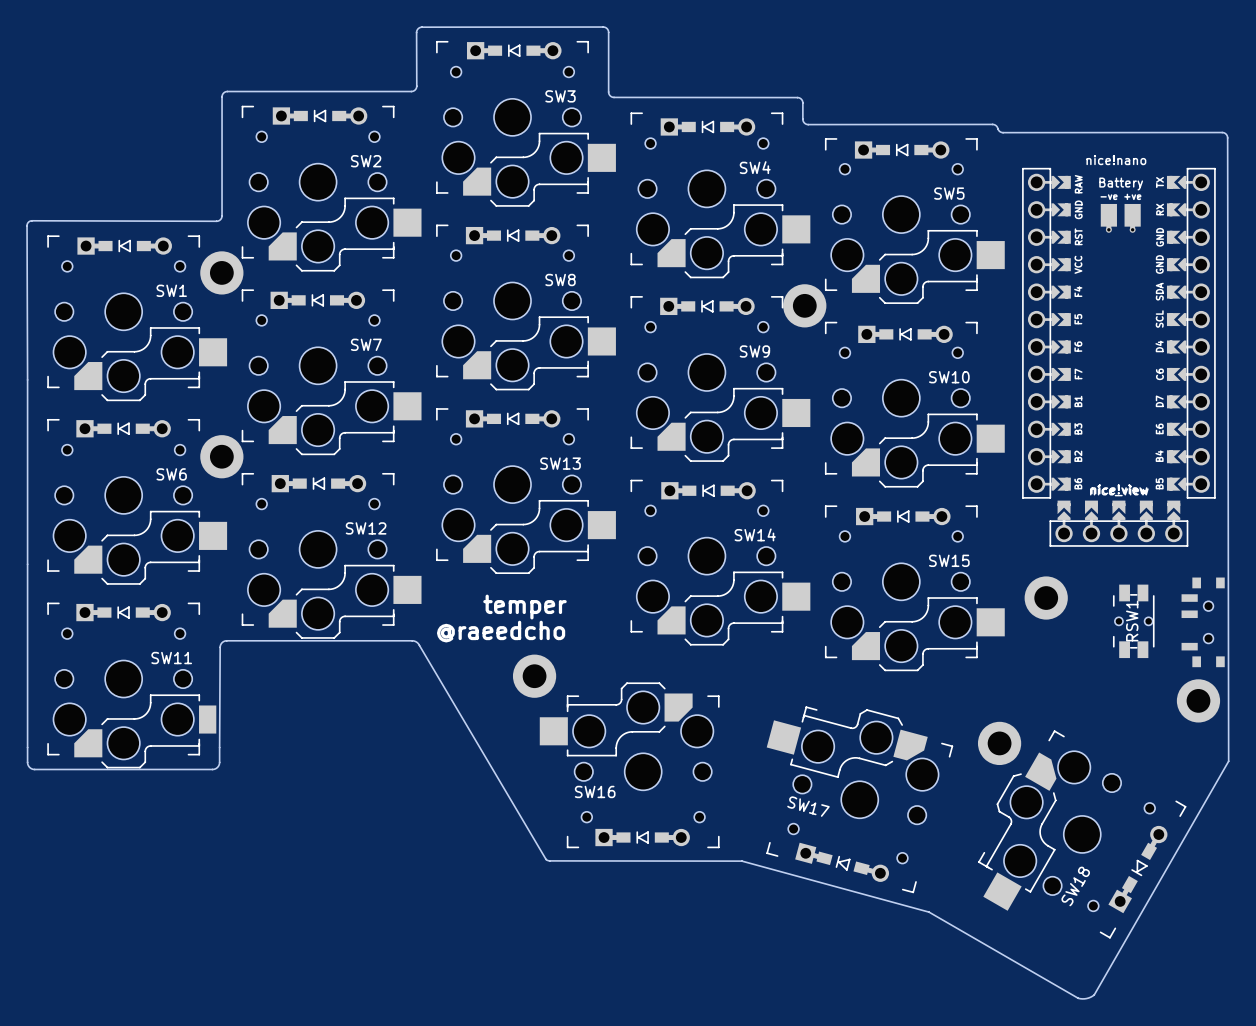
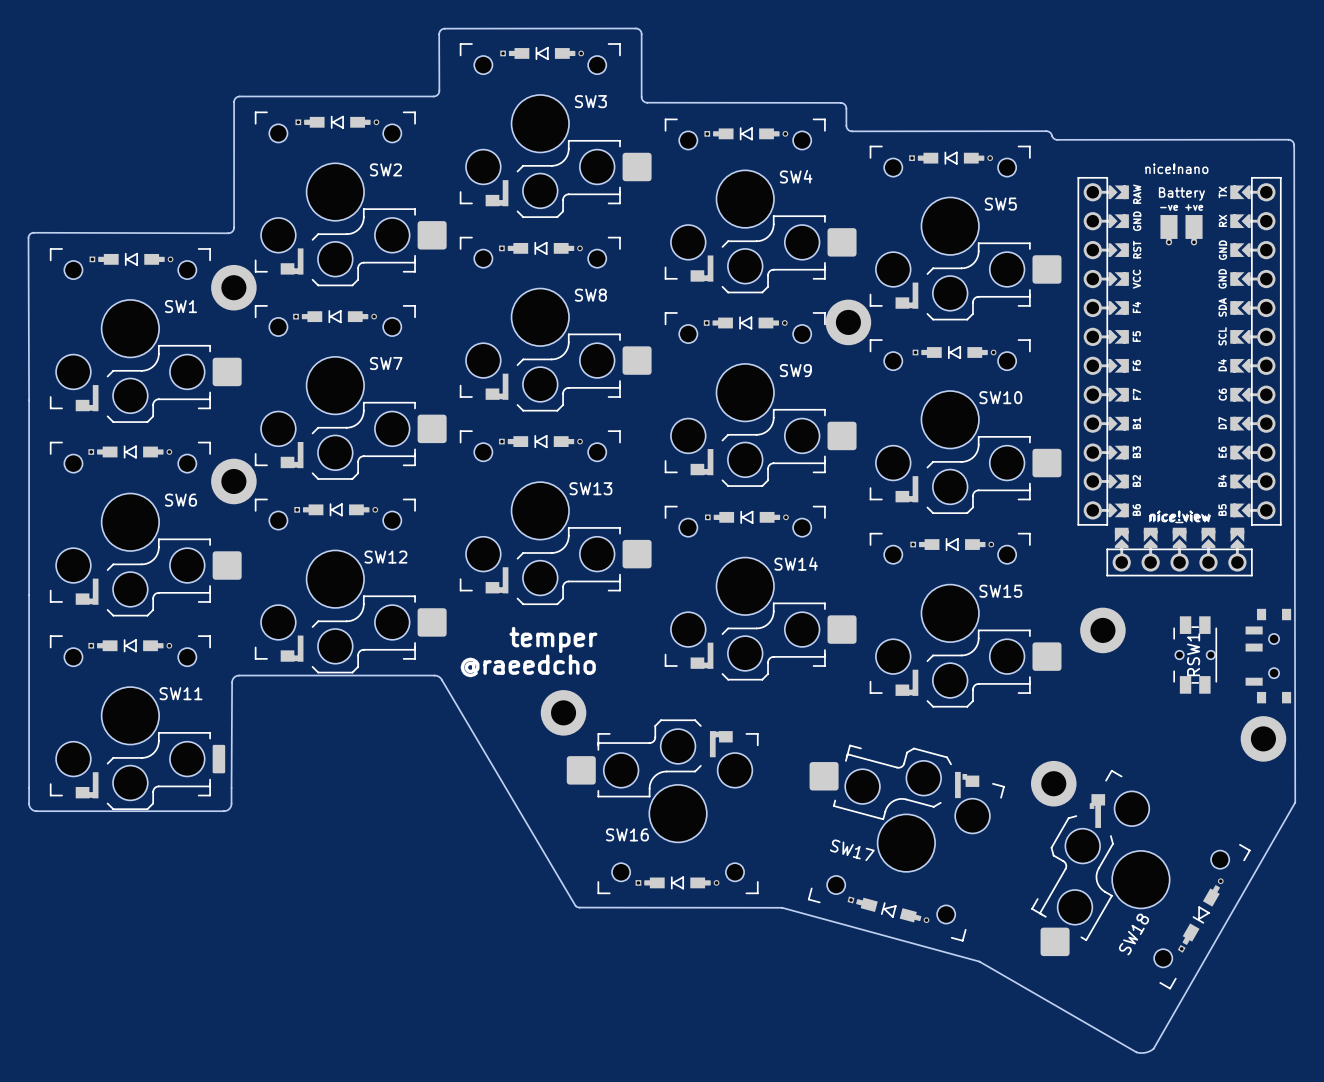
SW3 footprint: [436, 40, 616, 207] -> [459, 43, 652, 218]
part footprint: [467, 42, 562, 60] -> [500, 46, 585, 61]
SW2 footprint: [241, 105, 422, 272] -> [254, 111, 447, 287]
part footprint: [272, 107, 368, 125] -> [295, 115, 380, 129]
SW4 footprint: [630, 112, 811, 279] -> [664, 118, 857, 294]
part footprint: [660, 118, 756, 136] -> [704, 127, 789, 141]
SW5 footprint: [824, 138, 1005, 304] -> [869, 145, 1062, 321]
part footprint: [854, 141, 950, 159] -> [909, 151, 993, 165]
SW8 footprint: [436, 224, 616, 391] -> [459, 236, 652, 412]
part footprint: [465, 226, 561, 245] -> [499, 241, 583, 255]
SW1 footprint: [47, 235, 228, 402] -> [49, 248, 242, 423]
part footprint: [77, 237, 172, 255] -> [89, 252, 174, 266]
SW7 footprint: [241, 289, 422, 456] -> [254, 305, 447, 480]
part footprint: [270, 291, 366, 309] -> [293, 310, 377, 324]
SW9 footprint: [630, 296, 811, 462] -> [664, 312, 857, 487]
part footprint: [660, 297, 755, 316] -> [703, 316, 788, 330]
SW10 footprint: [824, 321, 1005, 488] -> [869, 339, 1062, 514]
part footprint: [858, 325, 953, 344] -> [912, 345, 997, 360]
SW13 footprint: [436, 408, 616, 574] -> [459, 430, 652, 606]
part footprint: [465, 410, 561, 428] -> [499, 435, 583, 449]
SW6 footprint: [47, 418, 228, 585] -> [49, 441, 242, 617]
part footprint: [76, 420, 171, 438] -> [88, 445, 173, 459]
SW12 footprint: [241, 472, 422, 639] -> [254, 498, 447, 674]
part footprint: [271, 474, 367, 493] -> [294, 503, 379, 517]
SW14 footprint: [630, 479, 811, 646] -> [664, 505, 857, 681]
part footprint: [661, 482, 756, 500] -> [705, 510, 789, 524]
SW15 footprint: [824, 505, 1005, 672] -> [869, 532, 1062, 708]
part footprint: [856, 507, 951, 526] -> [910, 537, 995, 552]
SW11 footprint: [47, 602, 217, 769] -> [49, 635, 226, 811]
part footprint: [76, 603, 171, 622] -> [88, 639, 173, 653]
SW16 footprint: [539, 682, 720, 849] -> [566, 719, 759, 895]
SW17 footprint: [766, 706, 954, 894] -> [807, 744, 1005, 942]
SW18 footprint: [978, 730, 1187, 939] -> [1031, 769, 1251, 990]
part footprint: [1108, 825, 1168, 914] -> [1177, 878, 1224, 953]
part footprint: [595, 828, 690, 847] -> [635, 876, 720, 890]
part footprint: [795, 842, 890, 882] -> [847, 896, 930, 924]

